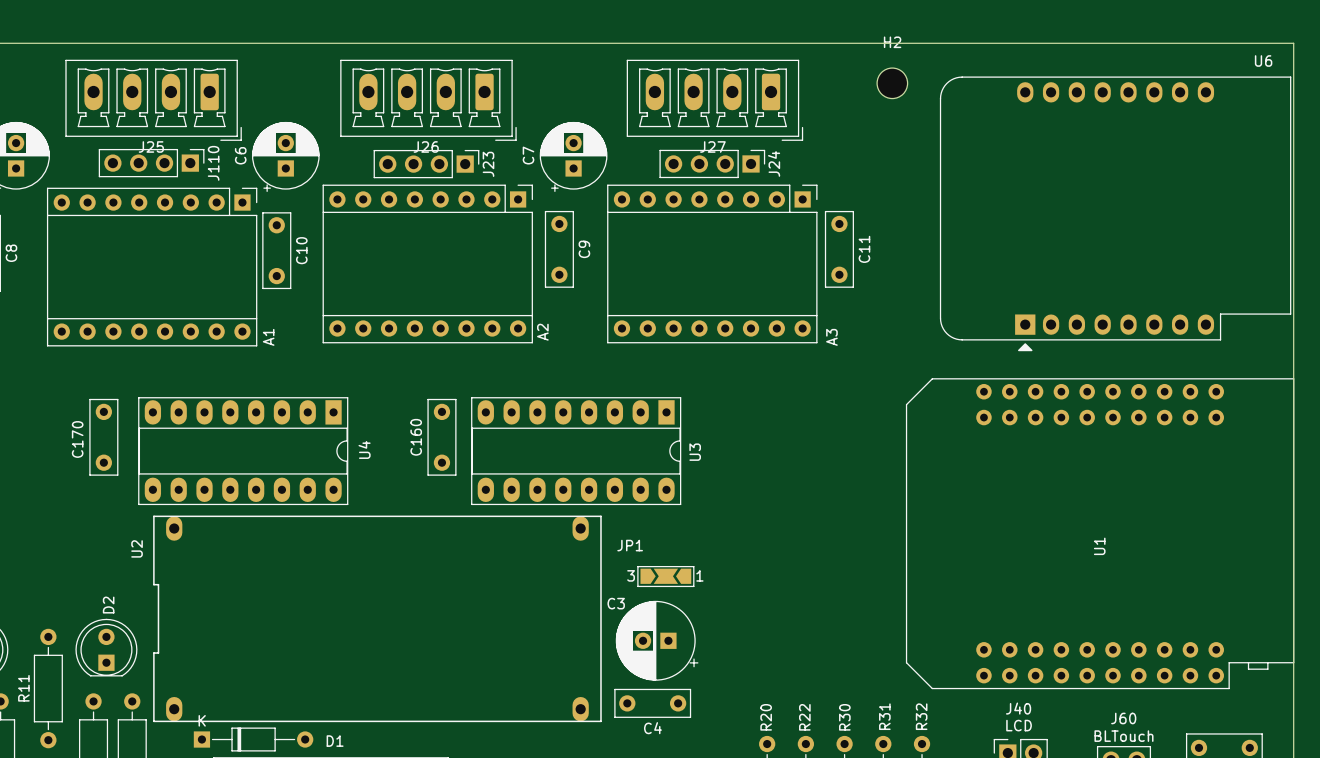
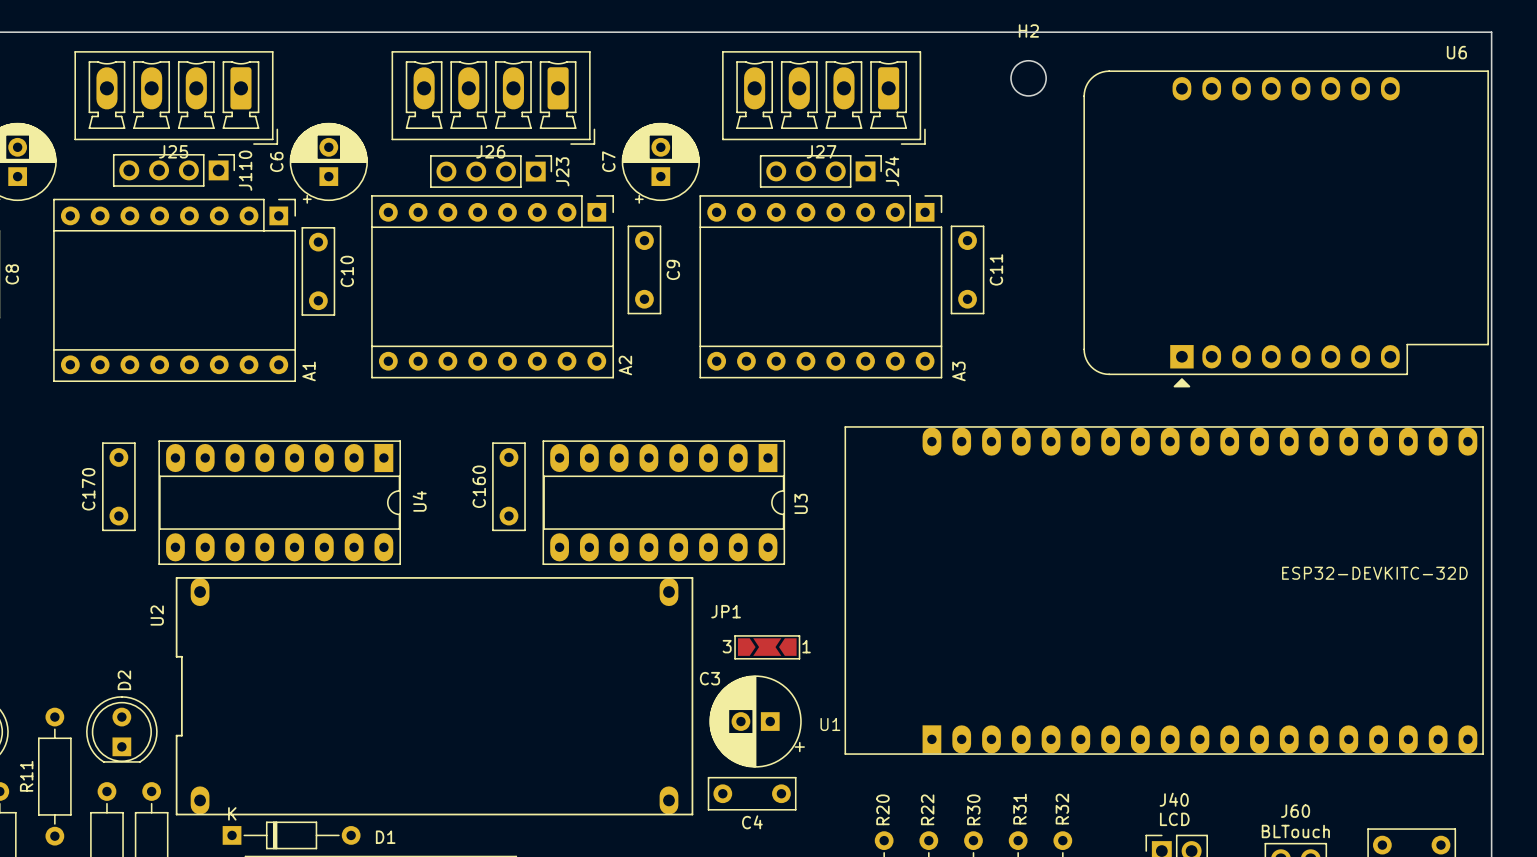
U1 footprint: [905, 378, 1295, 690] -> [844, 426, 1484, 755]
U1 value: none -> ESP32-DEVKITC-32D (1374, 573)
U1 name position: U1 (1099, 546) -> U1 (830, 724)

